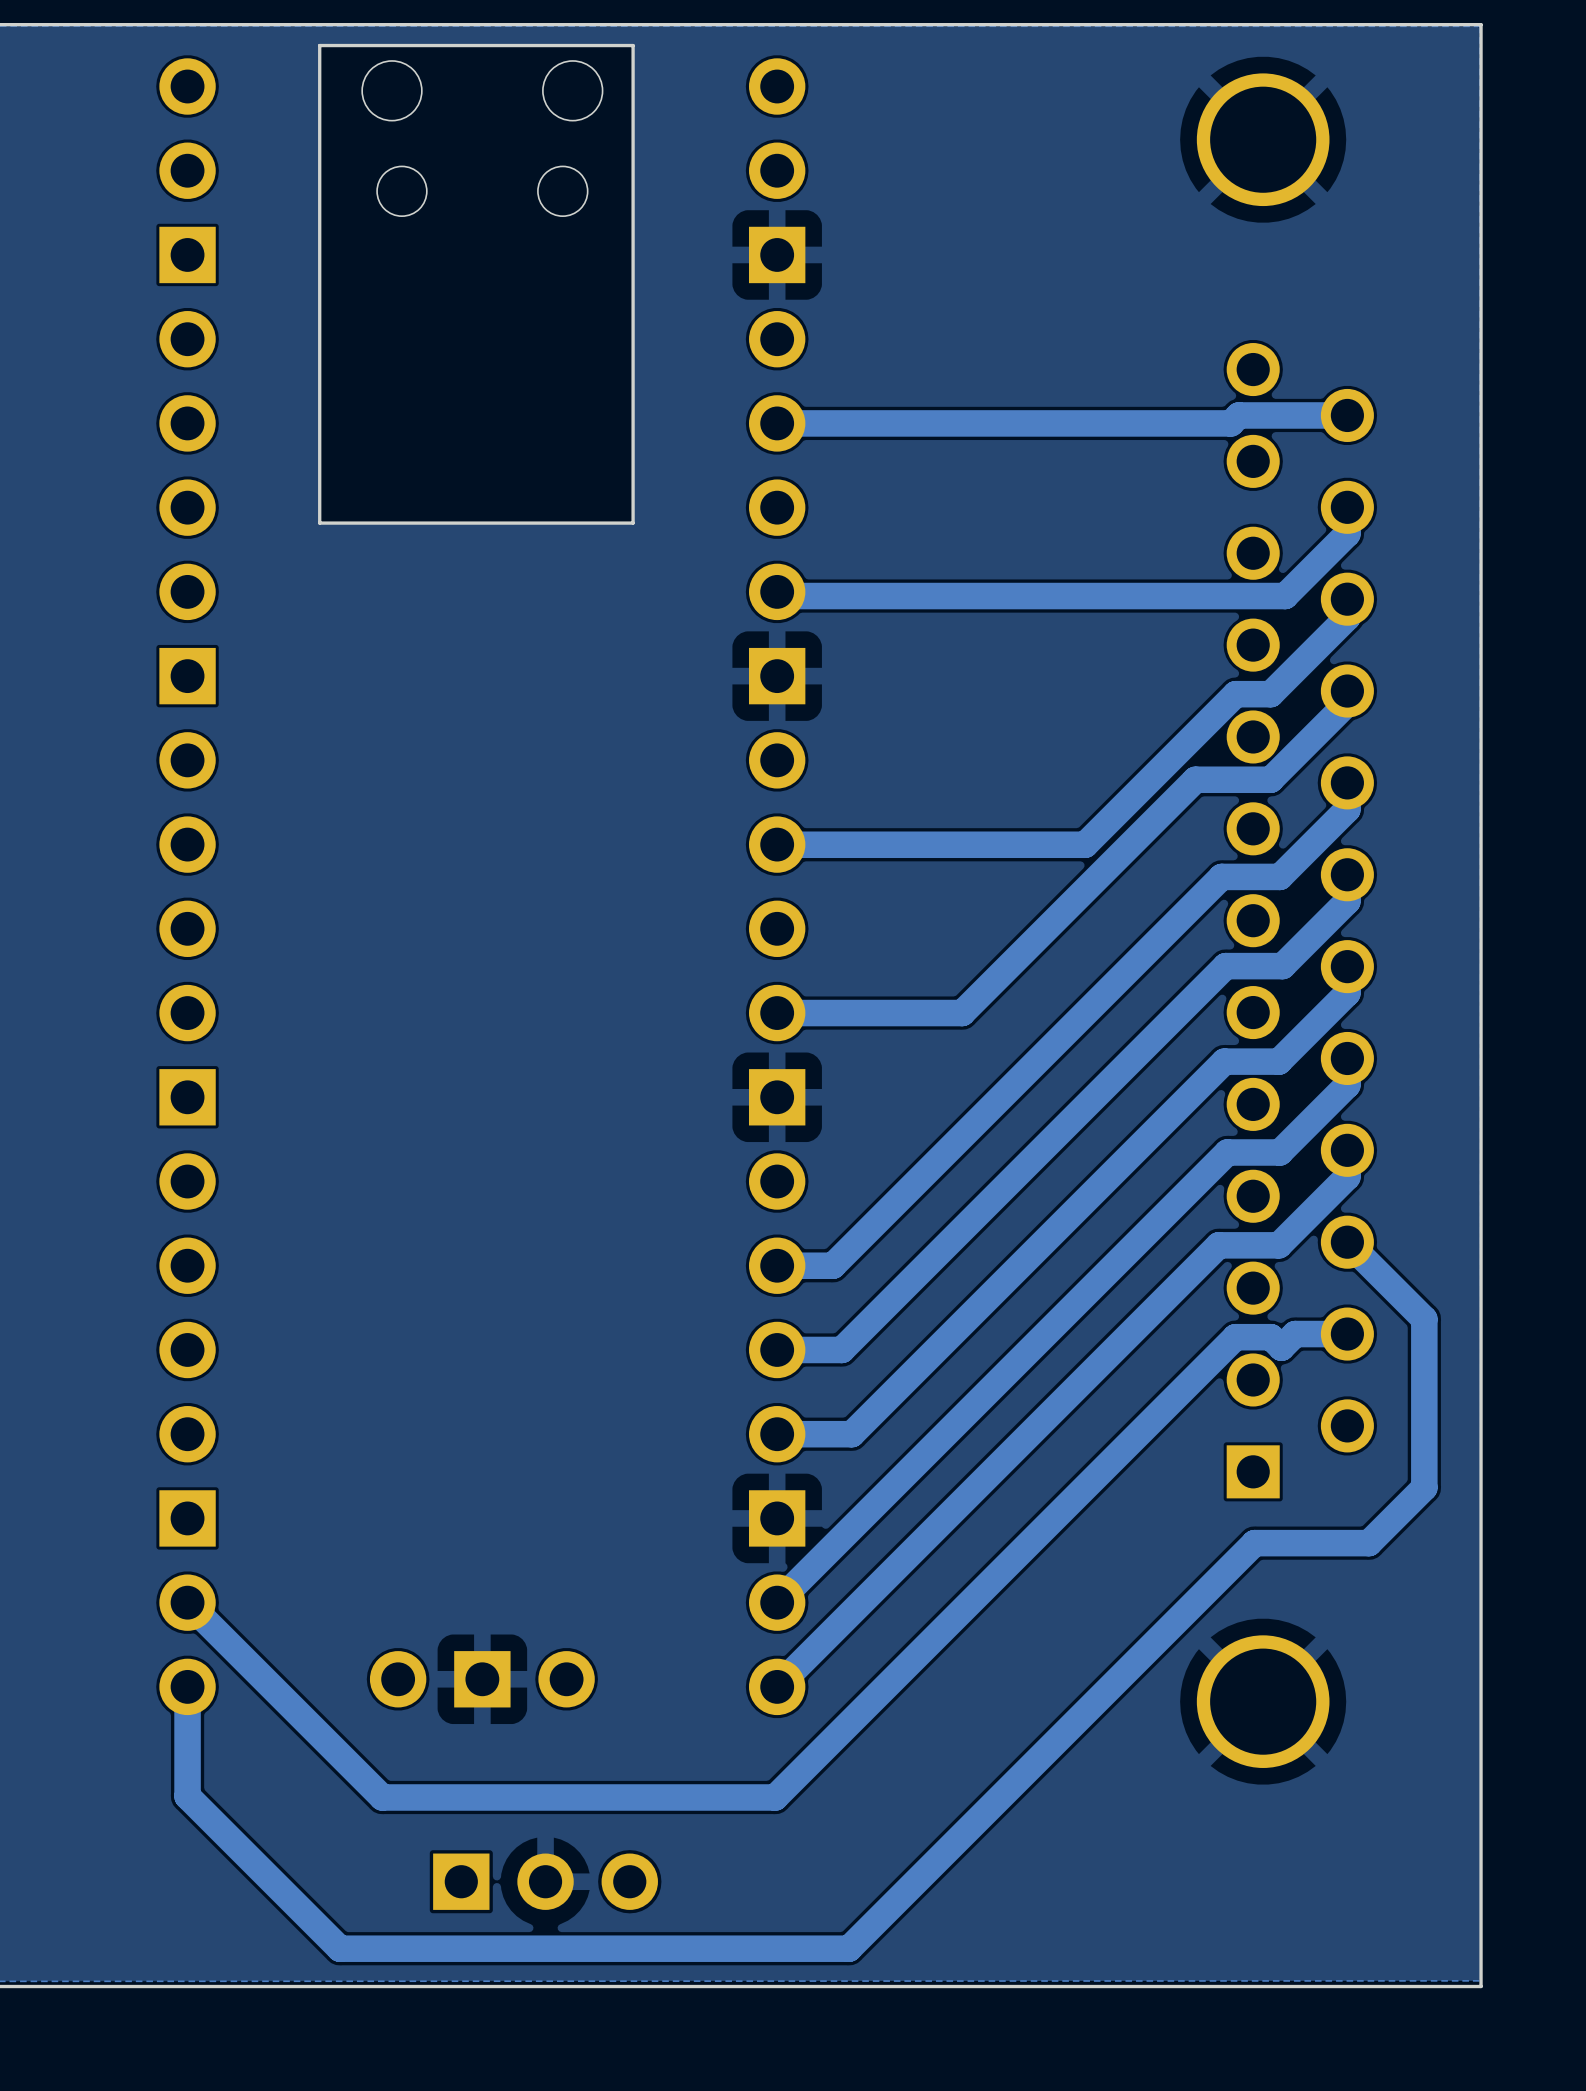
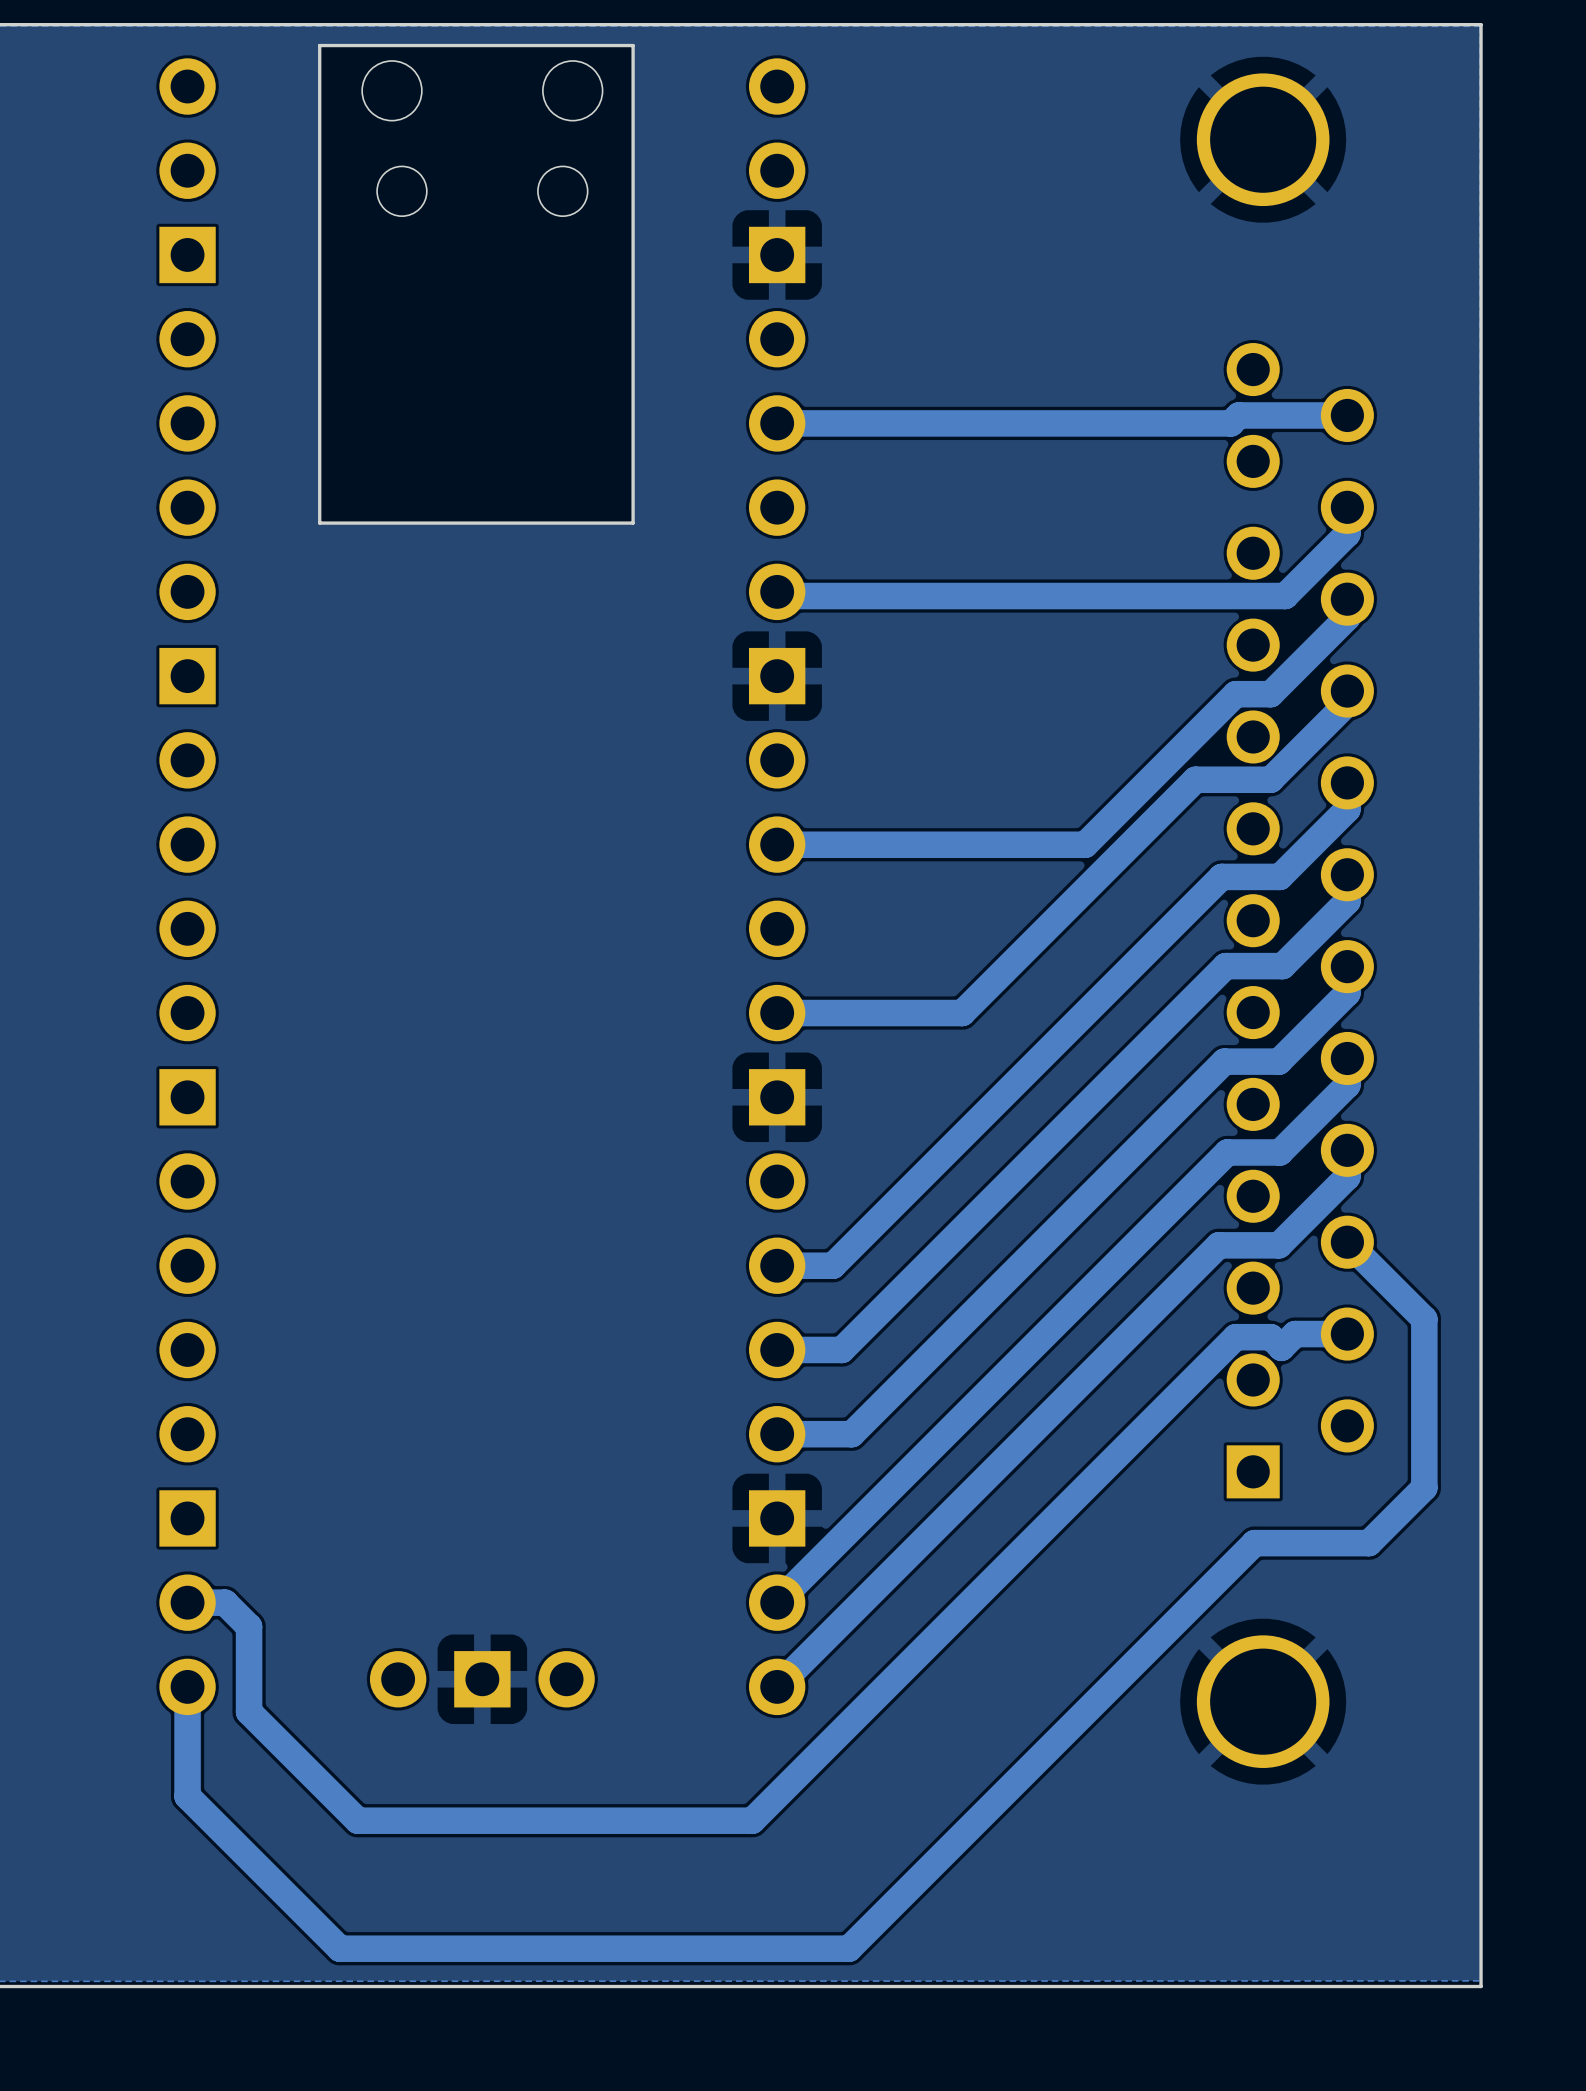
track: (1235, 1337) (775, 1797) (382, 1797) (187, 1602) -> (1235, 1337) (752, 1820) (357, 1820) (249, 1711) (249, 1626) (225, 1602) (187, 1602)
part: (545, 1881) -> none

